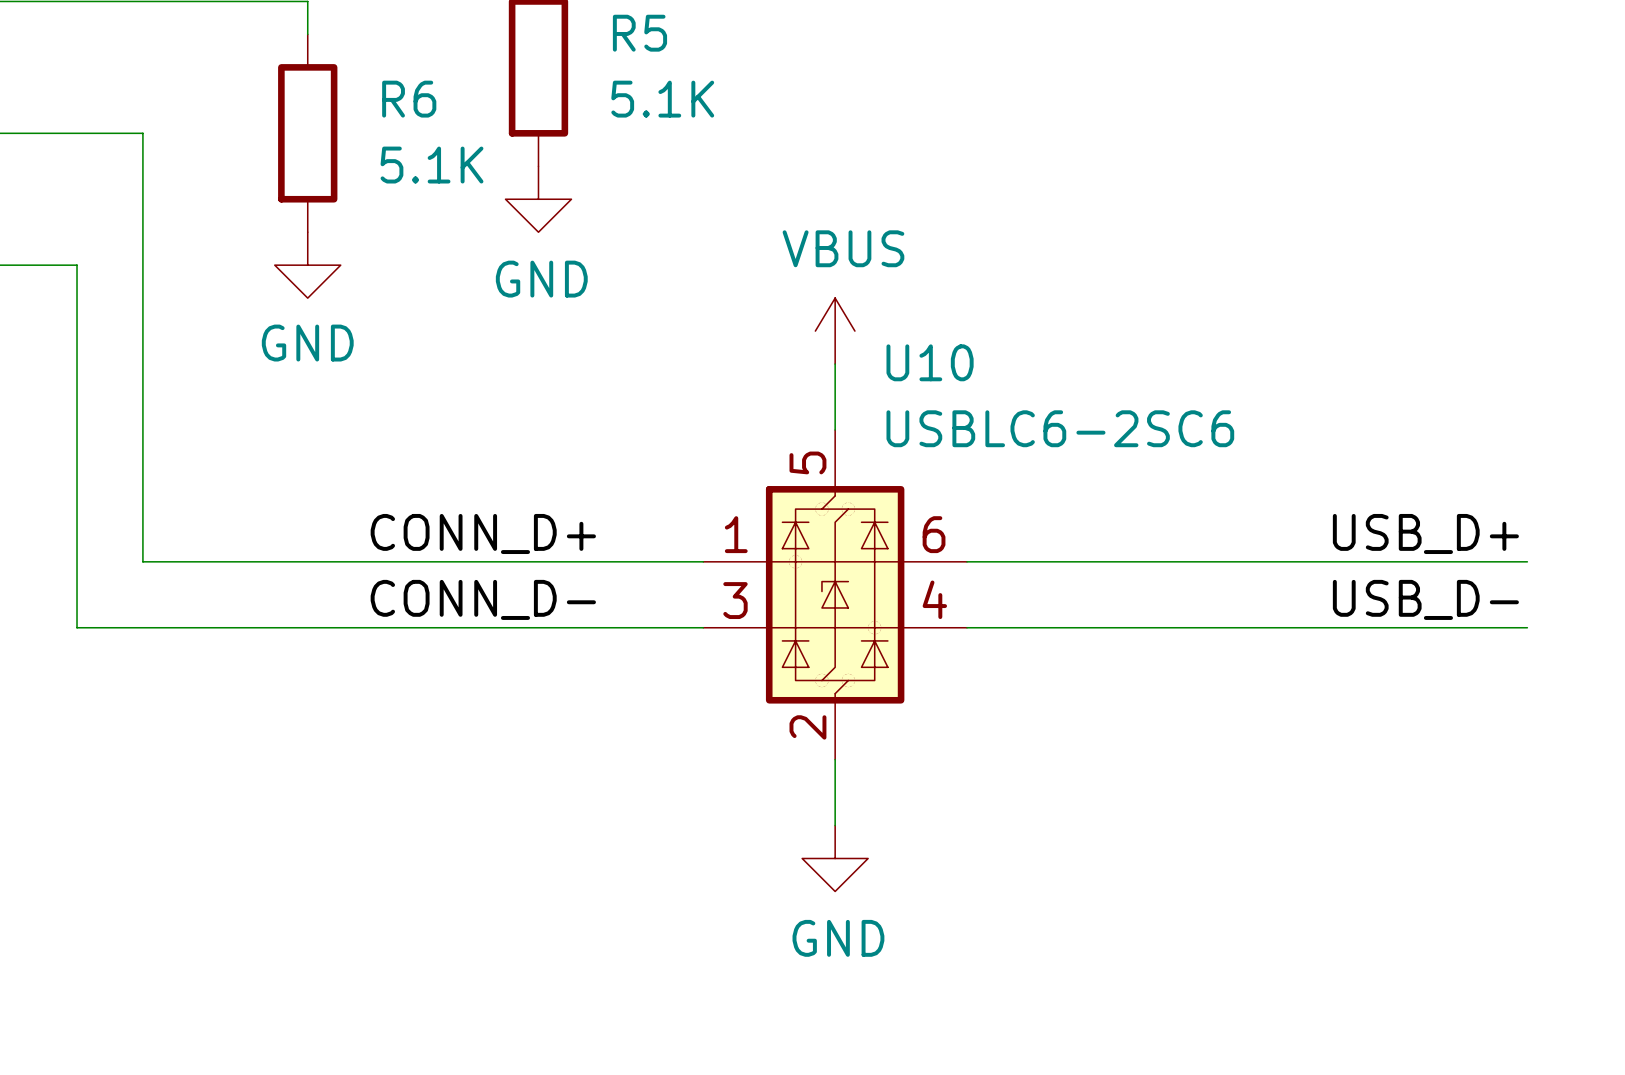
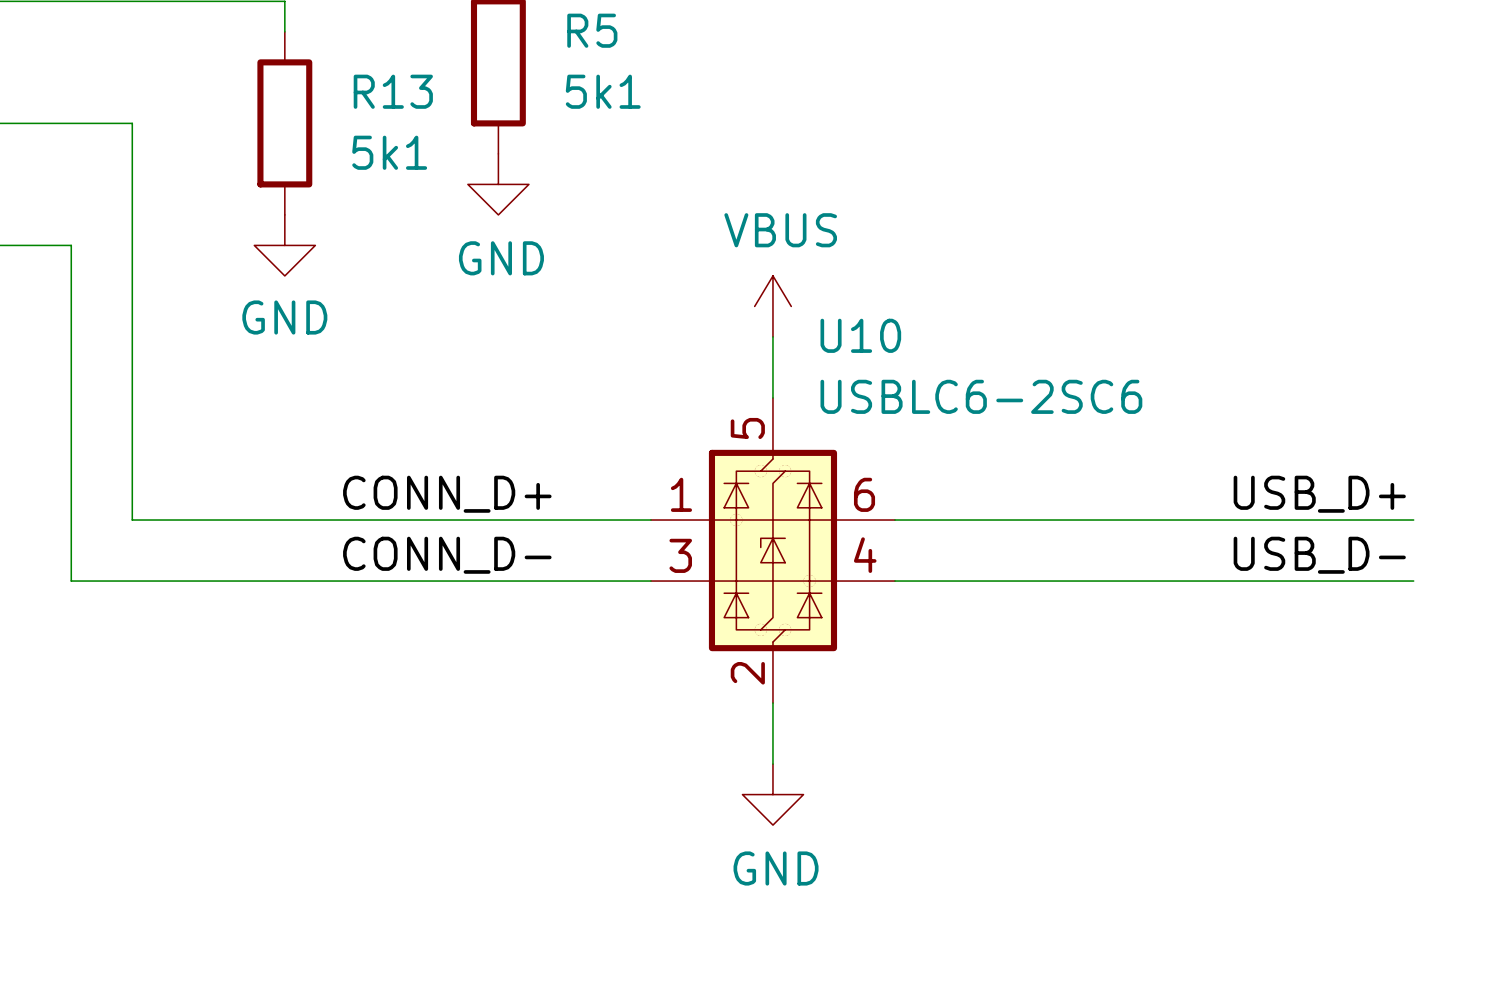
R6 name: R6 (409, 99) -> R13 (393, 91)
R5 value: 5.1K (662, 99) -> 5k1 (603, 91)
R6 value: 5.1K (432, 165) -> 5k1 (389, 152)

